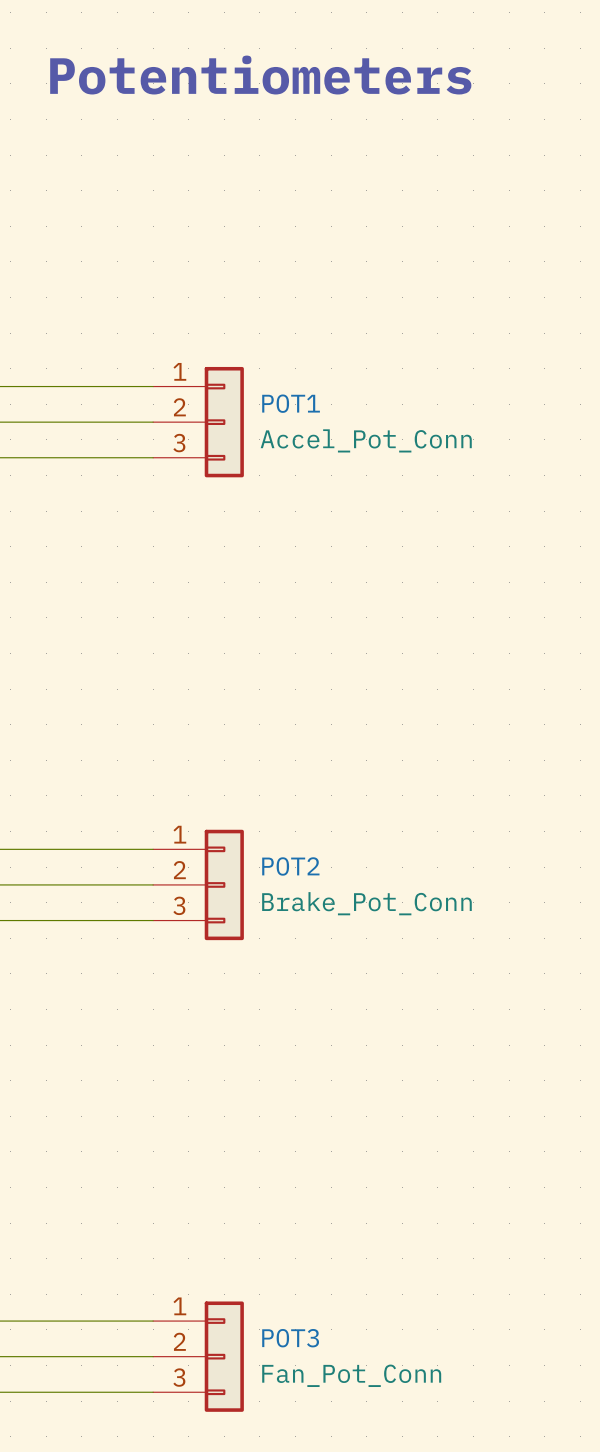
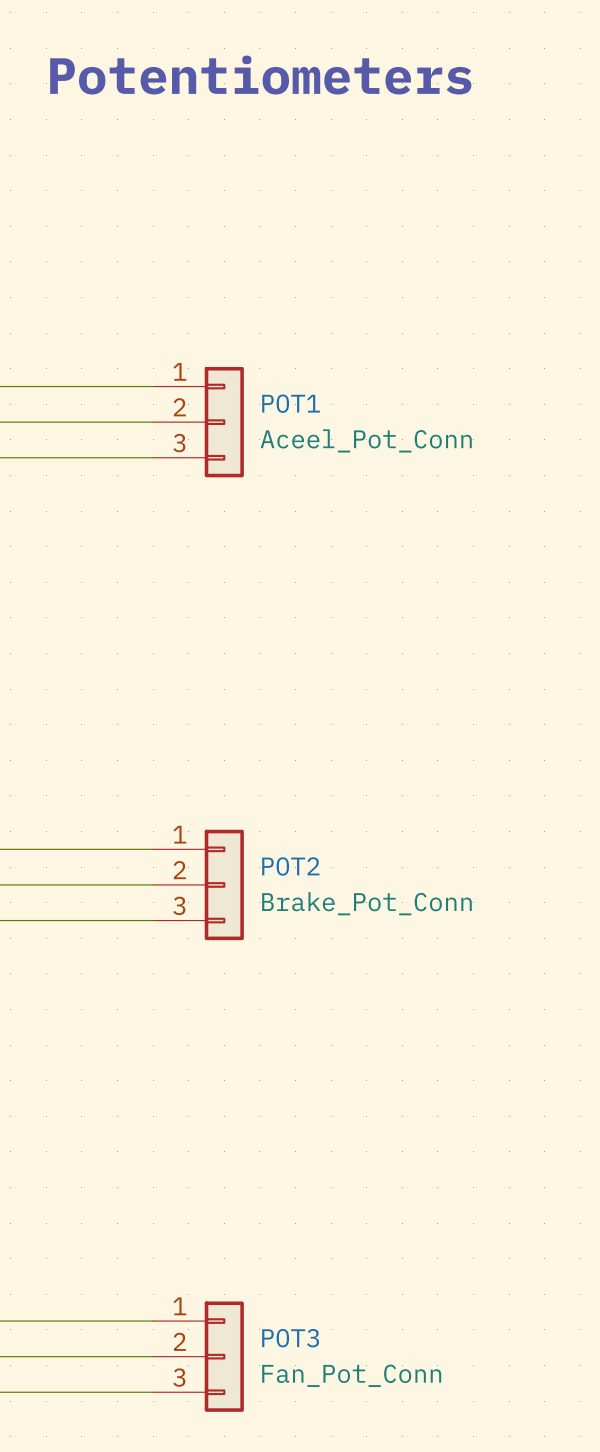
POT1 value: Accel_Pot_Conn (366, 440) -> Aceel_Pot_Conn (366, 440)

